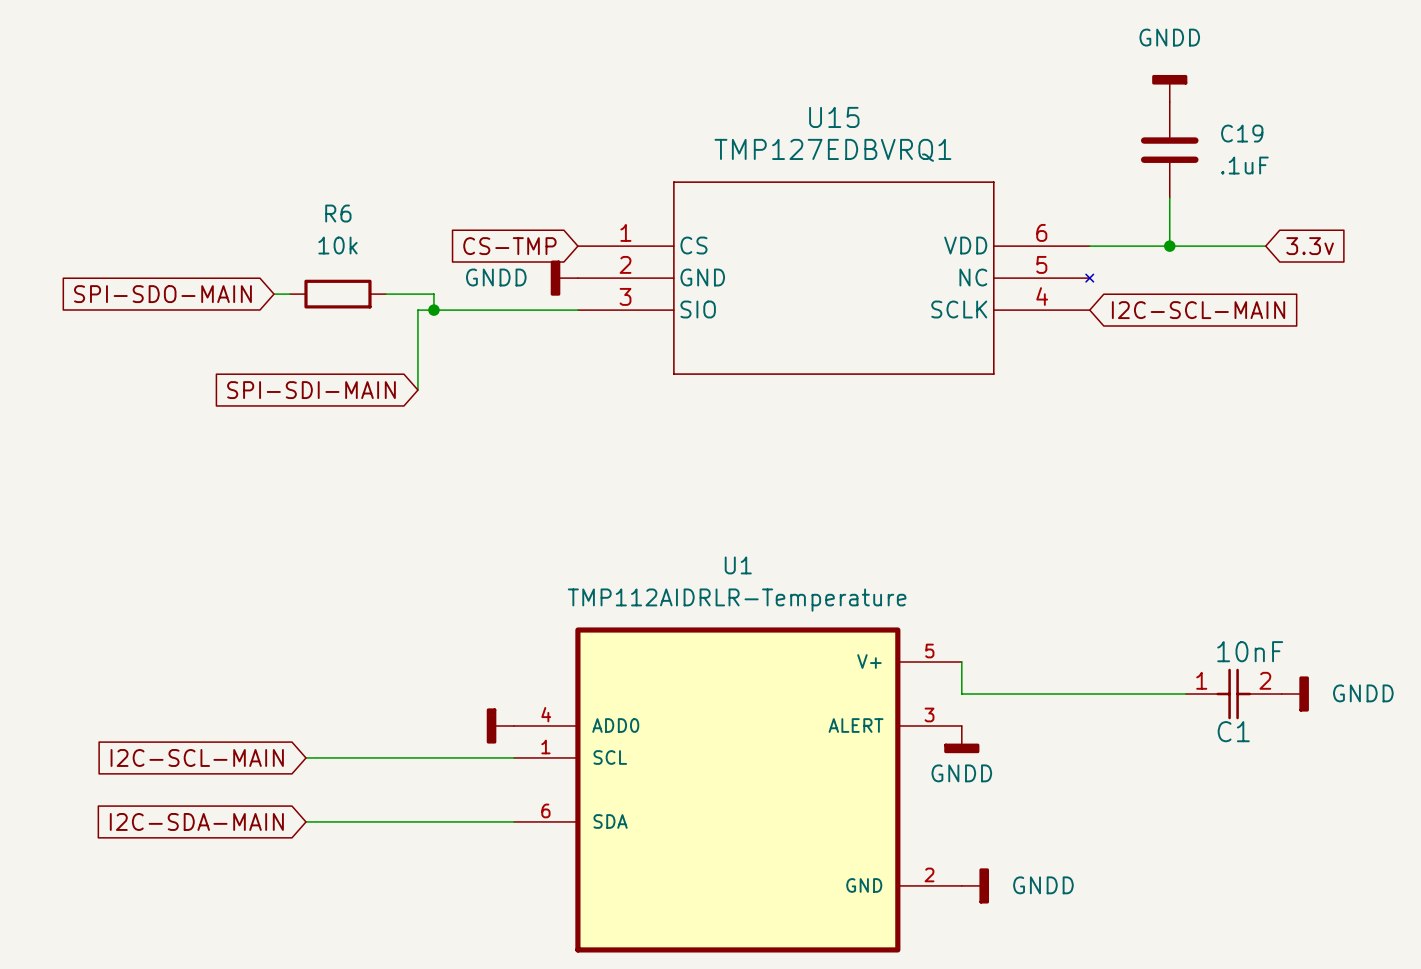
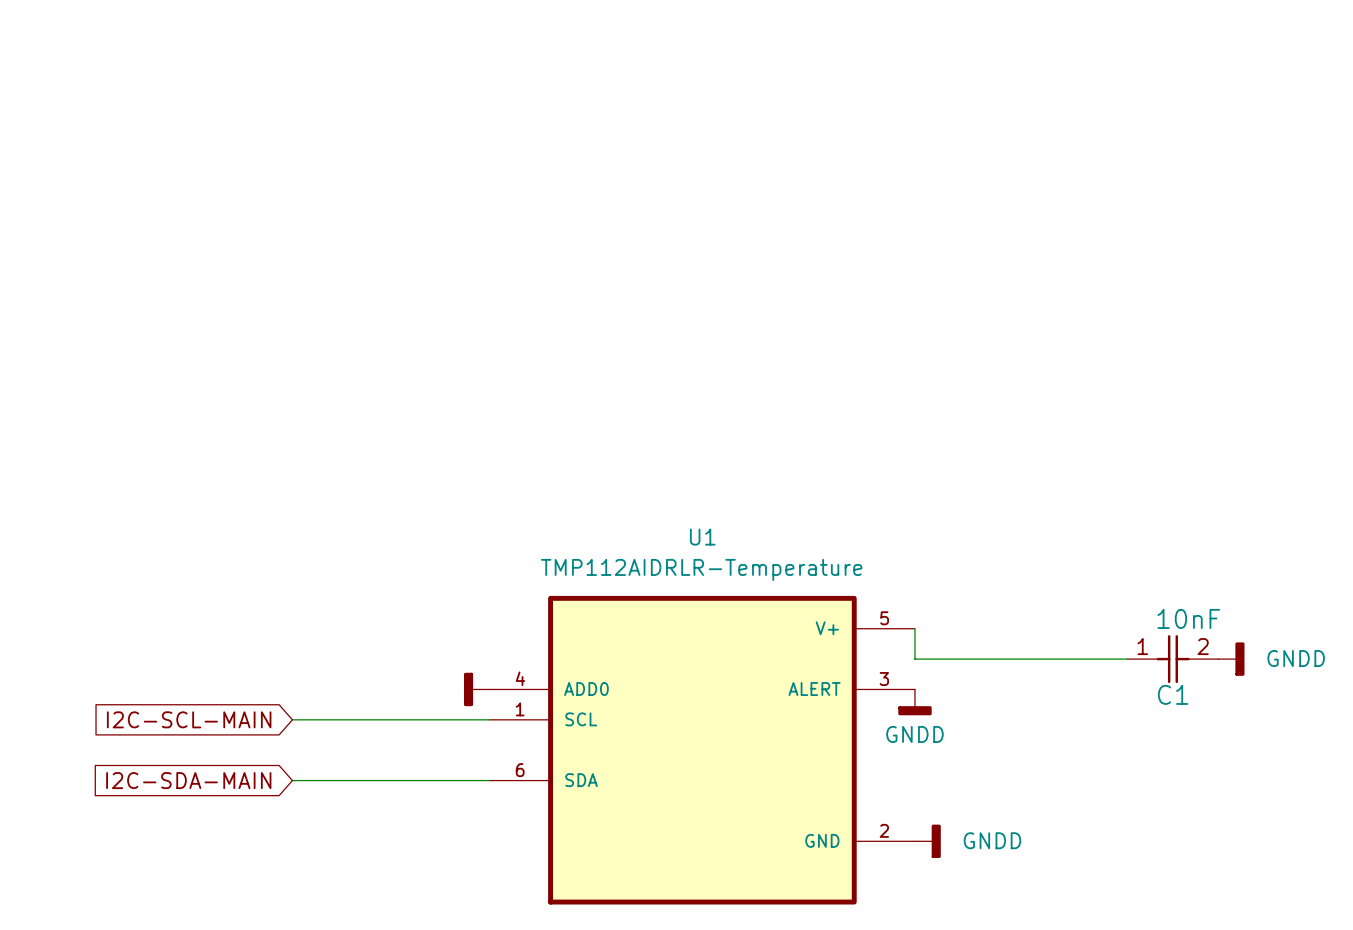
power symbol: GNDD (1169, 88) -> none
C19: .1uF (1169, 150) -> none
wire: (1169, 198) (1169, 246) -> none
global label: CS-TMP (509, 246) -> none
wire: (1089, 246) (1265, 246) -> none
junction: (1169, 246) -> none
global label: 3.3v (1310, 246) -> none
power symbol: GNDD (564, 278) -> none
U15: TMP127EDBVRQ1 (835, 278) -> none
global label: SPI-SDO-MAIN (162, 294) -> none
wire: (274, 294) (289, 294) -> none
R6: 10k (337, 294) -> none
wire: (385, 294) (433, 294) (433, 310) -> none
junction: (433, 310) -> none
wire: (577, 310) (417, 310) (417, 390) -> none
global label: I2C-SCL-MAIN (1198, 310) -> none
global label: SPI-SDI-MAIN (311, 390) -> none

